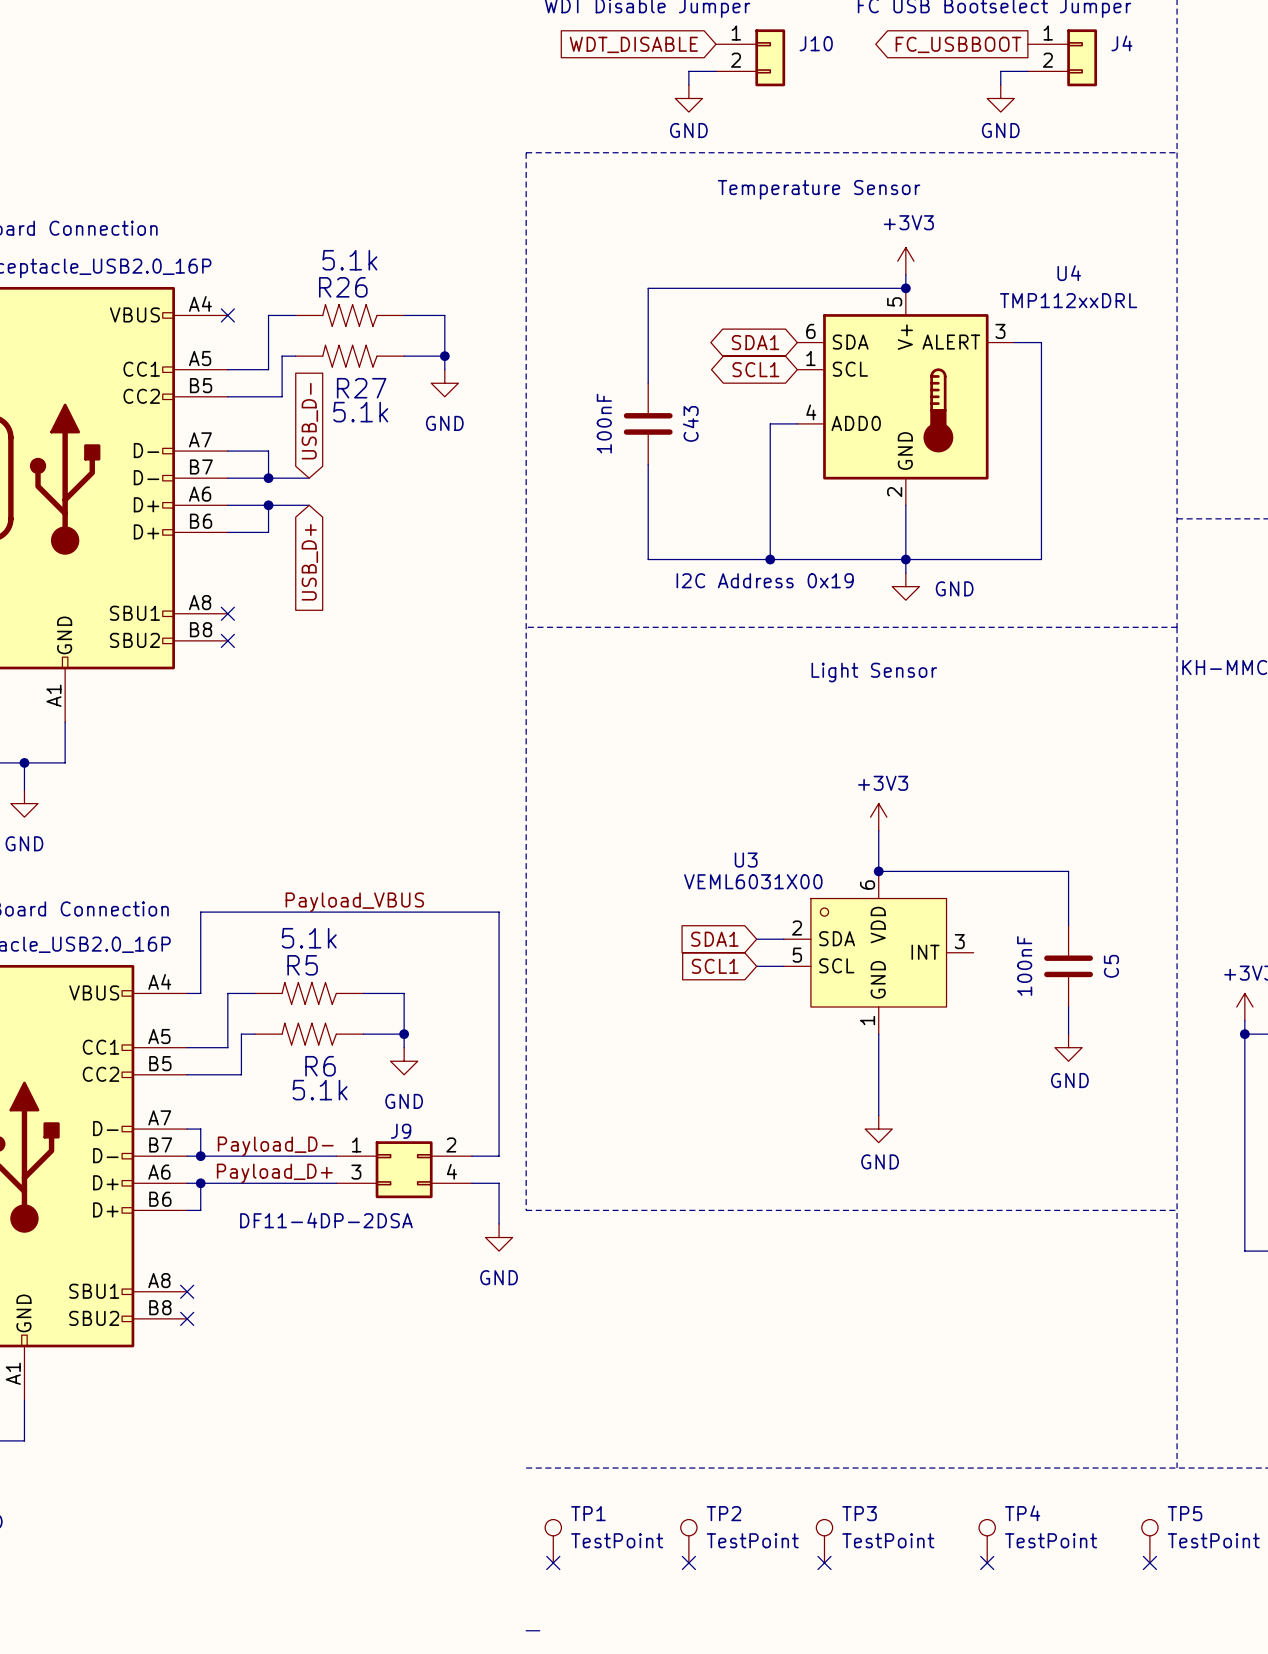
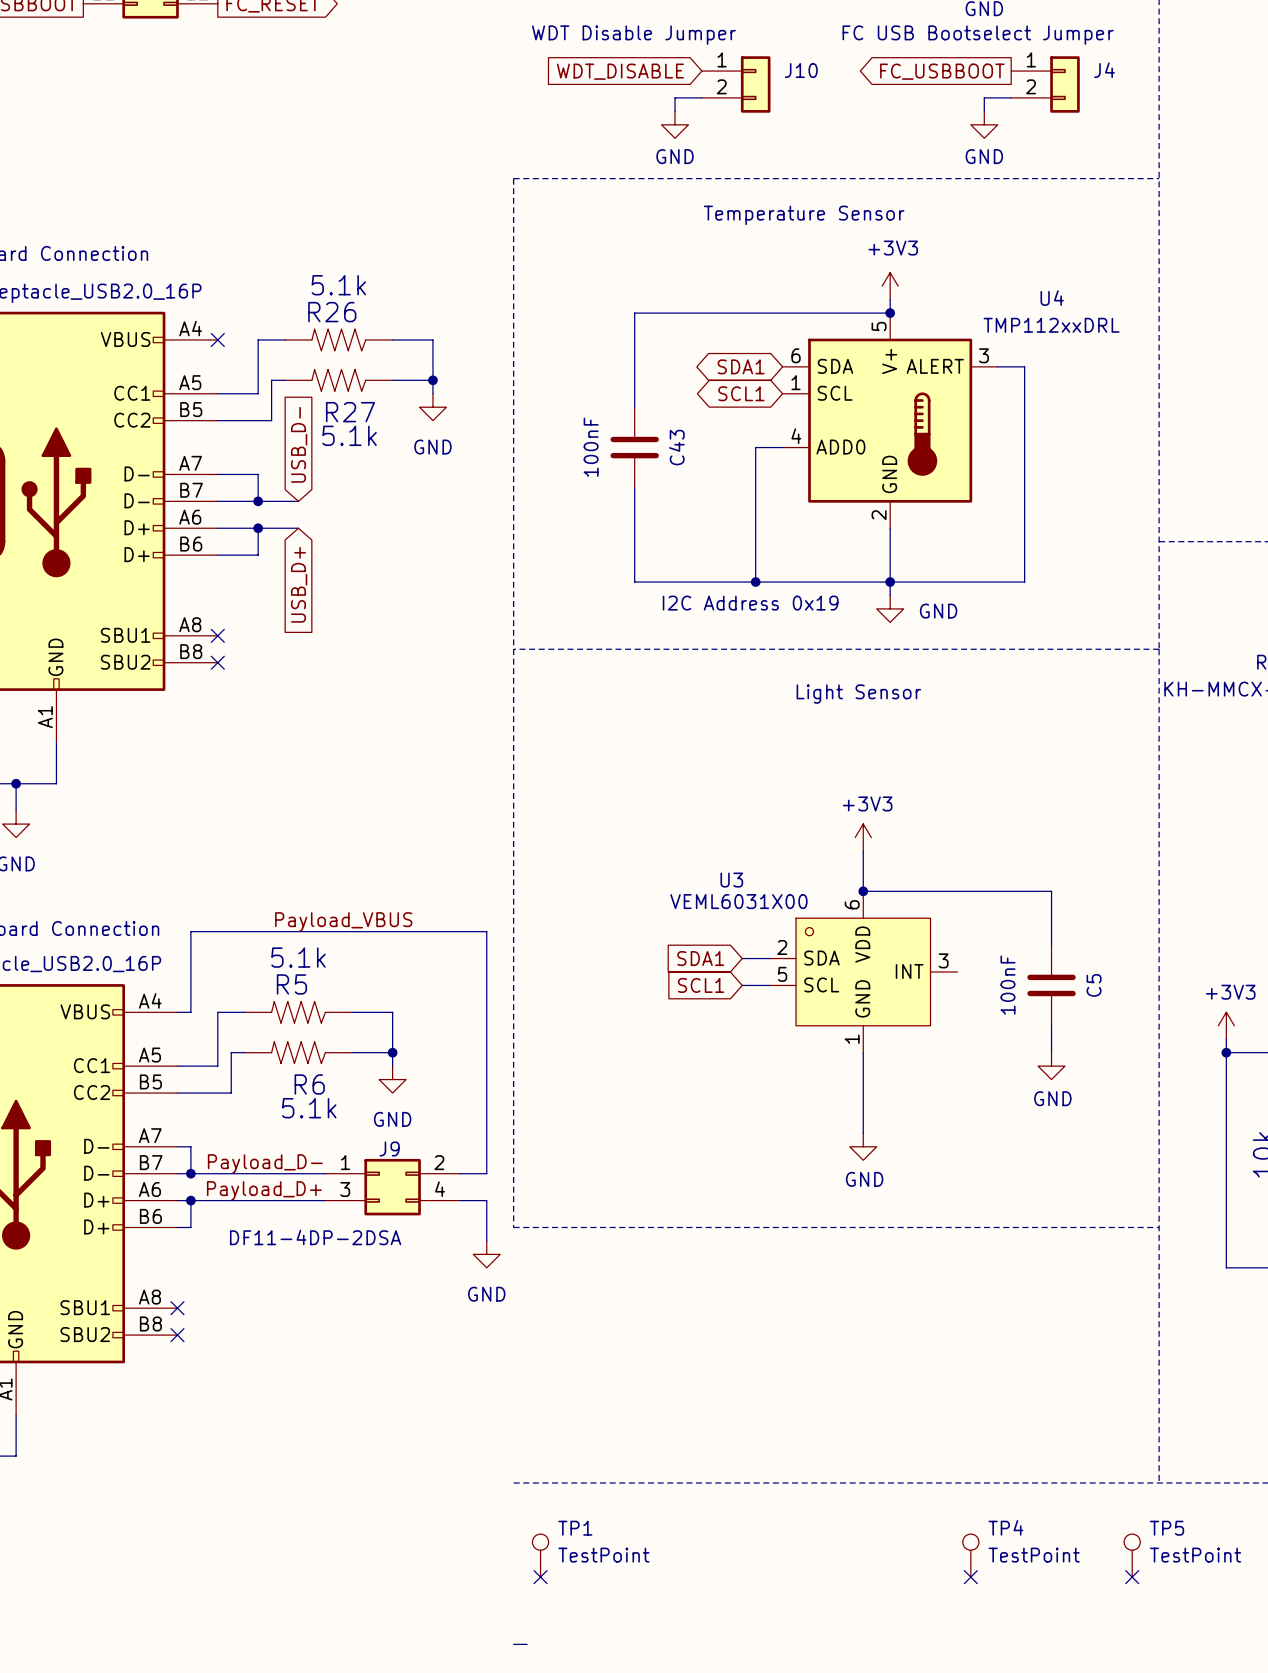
TP2: TestPoint (688, 1541) -> none
TP3: TestPoint (824, 1541) -> none
no-connect mark: (688, 1562) -> none
no-connect mark: (824, 1562) -> none

